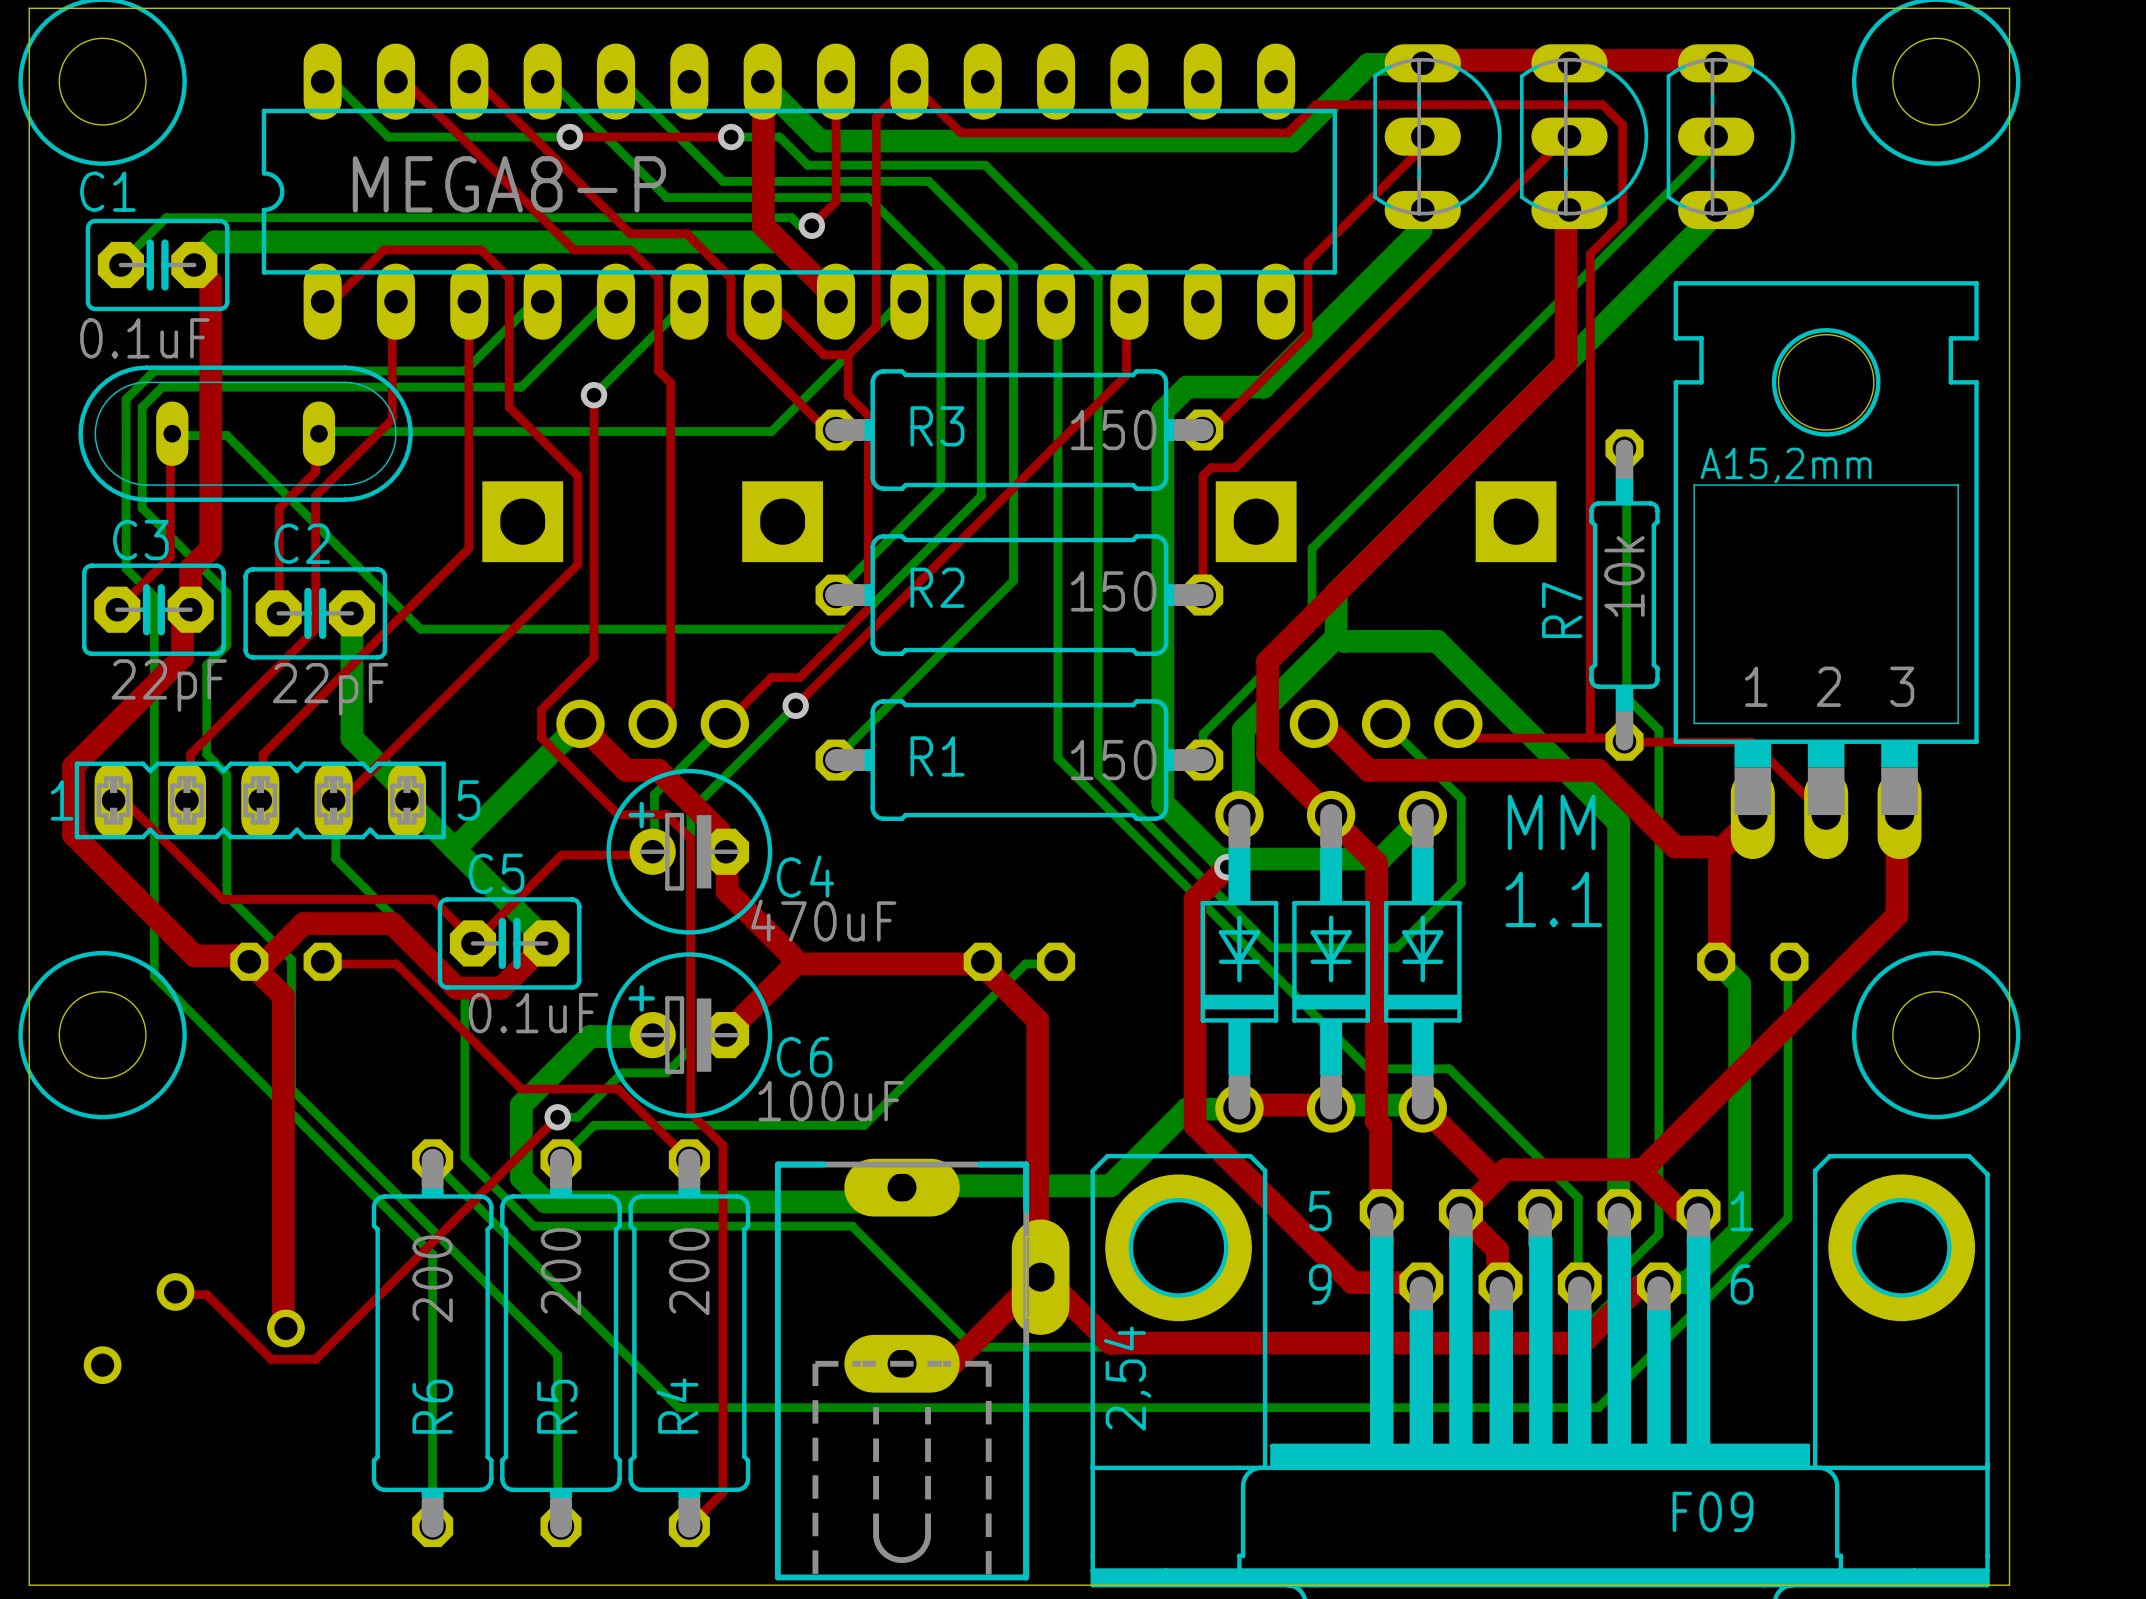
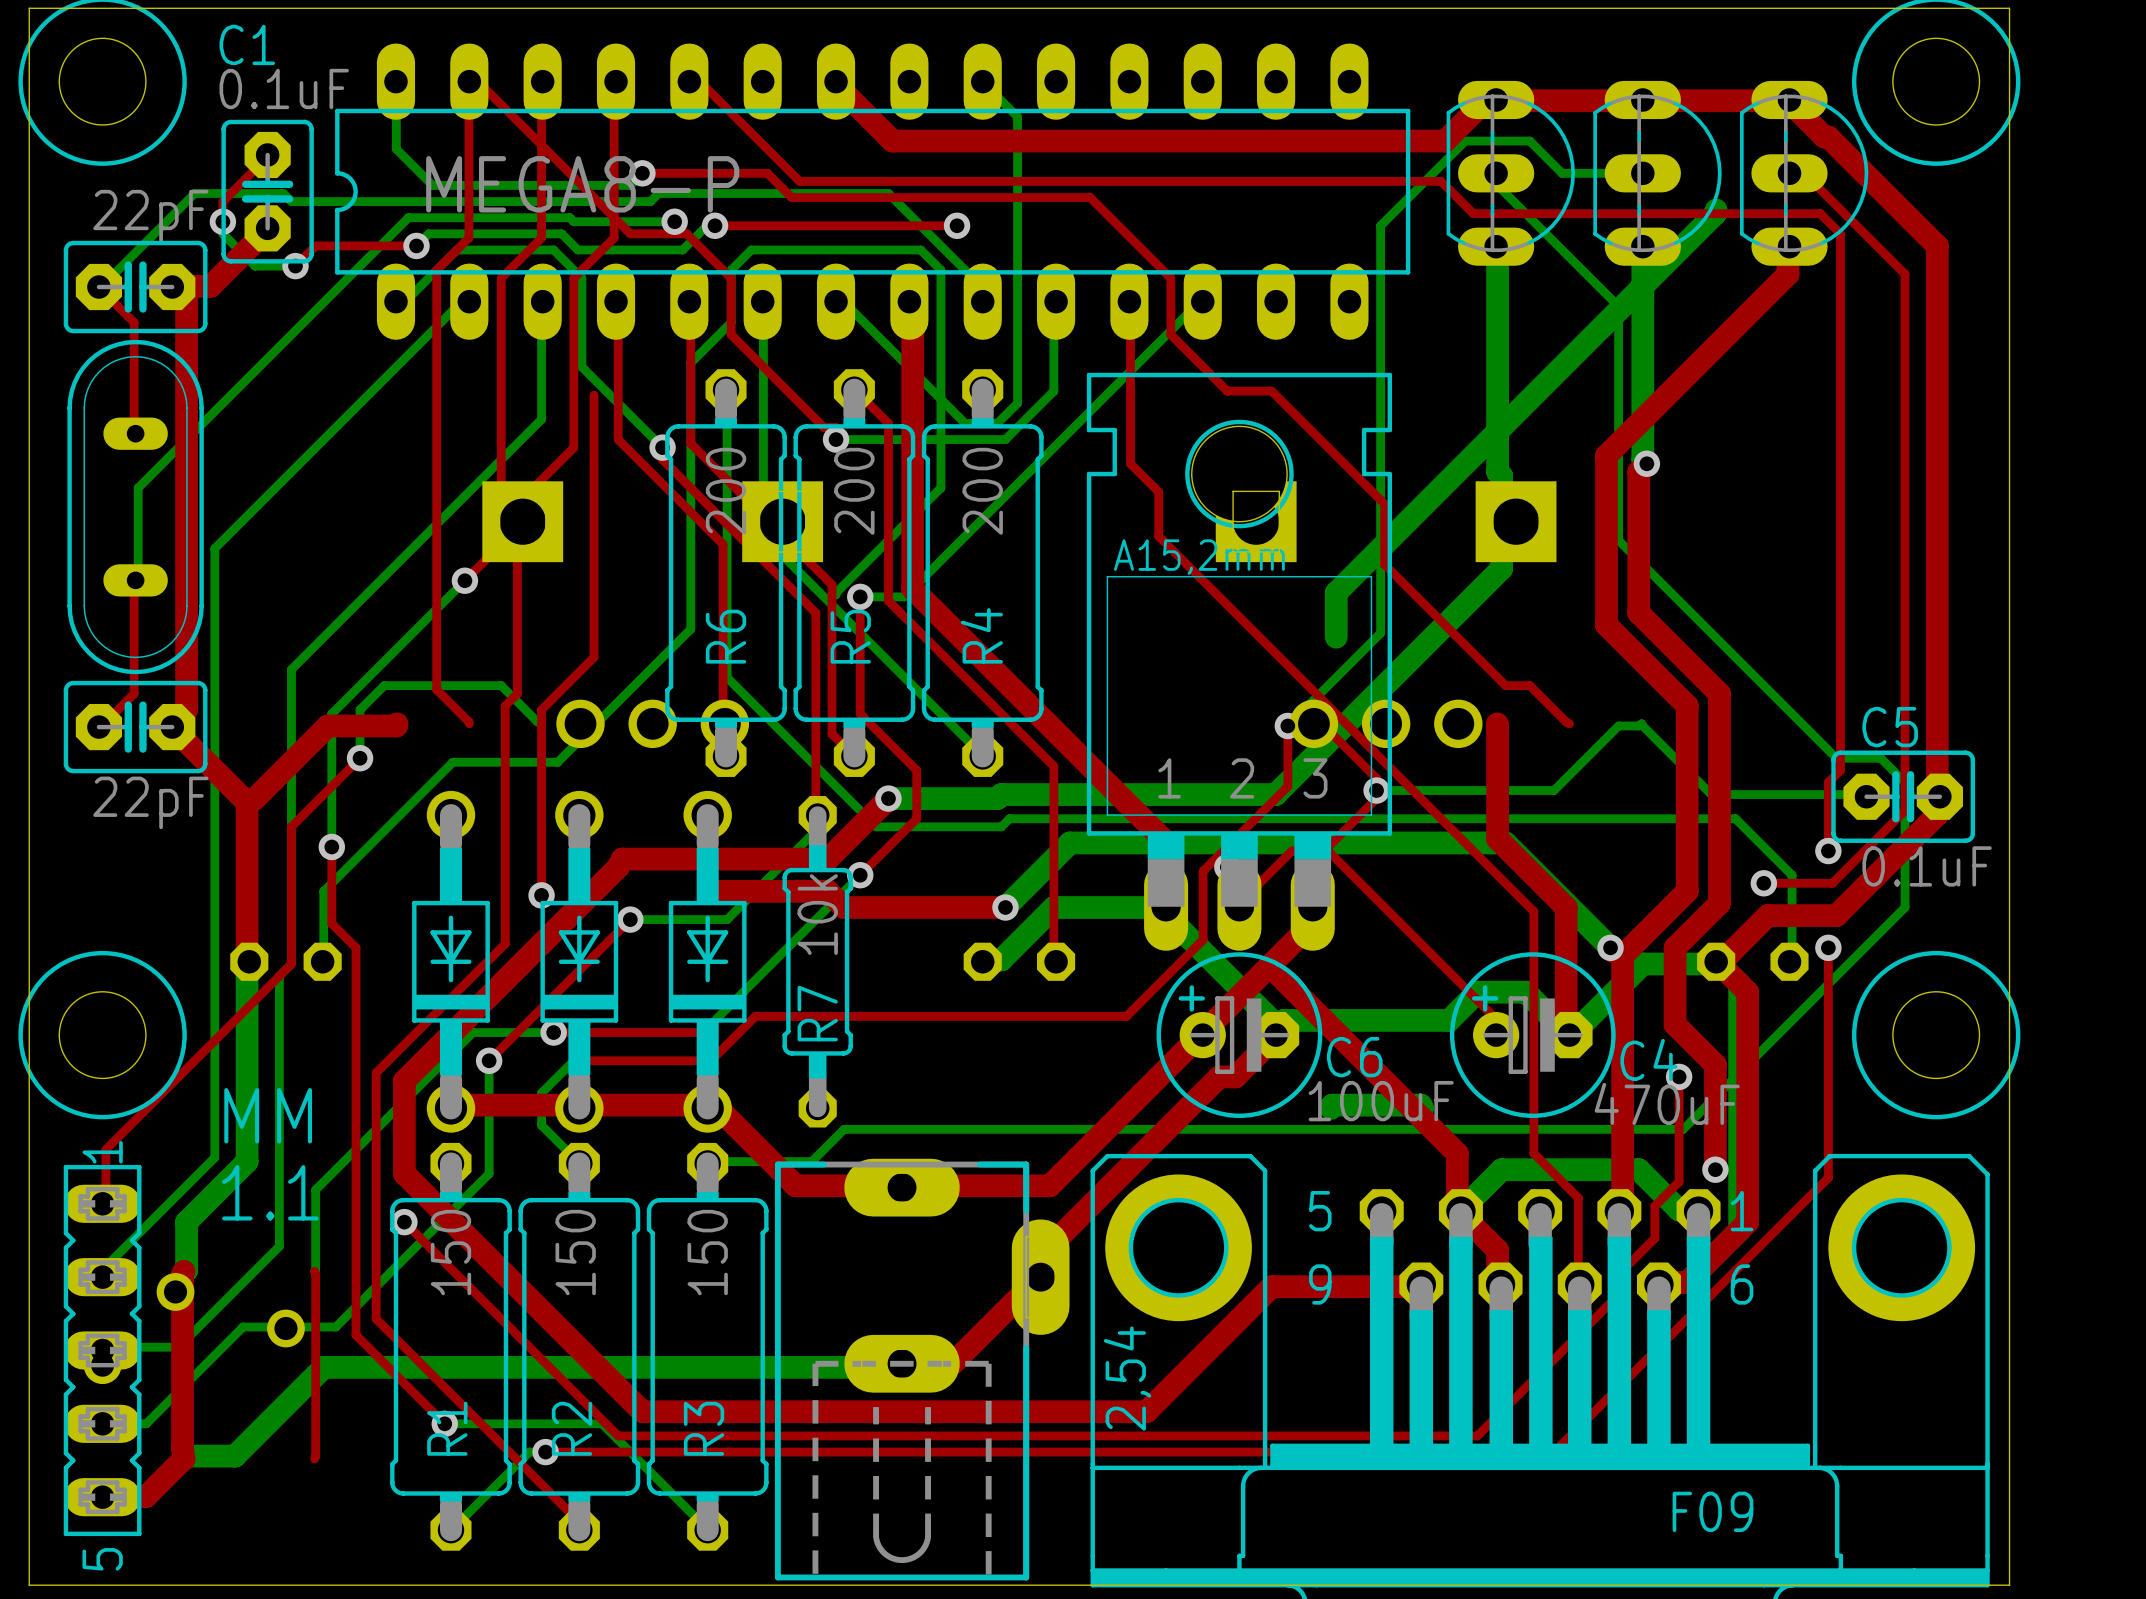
top track: (1422, 63) (1424, 60) (1566, 60) (1569, 63) (1578, 60) (1715, 60) (1716, 63) -> none
bottom track: (1422, 63) (1368, 64) (1291, 141) (819, 141) (763, 84) (762, 81) -> none
bottom track: (322, 81) (323, 84) (335, 84) (388, 137) (569, 137) -> none
top track: (395, 81) (396, 84) (408, 84) (573, 249) (630, 249) (658, 278) (658, 370) (670, 383) (670, 705) (652, 723) -> none
bottom track: none -> (395, 81) (396, 149) (432, 185) (630, 185) (642, 173)
top track: none -> (469, 81) (468, 237) (436, 270) (436, 689) (469, 723)
top track: none -> (542, 81) (541, 237) (501, 278) (501, 544) (464, 580)
bottom track: (542, 81) (545, 84) (553, 84) (666, 197) (868, 197) (920, 249) -> (322, 961) (323, 891) (452, 762) (557, 762) (690, 629) (690, 362) (731, 322) (731, 270) (751, 249) (920, 249)
top track: none -> (616, 81) (614, 84) (614, 237) (573, 278) (573, 447) (517, 504) (517, 693) (505, 705) (505, 943) (376, 1072) (376, 1318) (577, 1520) (579, 1530)
bottom track: (616, 81) (618, 84) (626, 84) (723, 181) (928, 181) (1013, 266) (1013, 580) (836, 760) -> none
top track: none -> (689, 81) (690, 84) (702, 84) (799, 181) (1441, 181) (1473, 213) (1820, 213) (1840, 233) (1840, 770) (1828, 782) (1828, 851)
top track: (762, 81) (763, 225) (836, 298) -> none
top track: (836, 84) (836, 201) (811, 225) -> none
top track: (1422, 136) (1420, 137) (1420, 149) (1308, 262) (1308, 334) (1215, 427) (1203, 427) (1202, 430) -> none
part: (1437, 136) -> none
top track: (1569, 136) (1566, 137) (1235, 467) (1211, 467) (1203, 475) (1202, 595) -> none
part: (1584, 136) -> none
bottom track: (1716, 136) (1715, 145) (1312, 548) (1312, 625) (1203, 734) (1202, 760) -> none
part: (1730, 136) -> none
top track: (569, 137) (731, 137) -> none
via: (569, 137) -> none
bottom track: (731, 137) (779, 137) (807, 165) (985, 165) (1098, 278) (1098, 774) (1271, 947) (1396, 947) (1461, 883) (1461, 798) (1386, 723) -> none
via: (731, 137) -> none
top track: none -> (267, 154) (222, 201) (222, 221)
top track: none -> (642, 173) (767, 173) (791, 197) (1090, 197) (1170, 278) (1170, 334) (1227, 391) (1271, 391) (1384, 504) (1384, 564) (1505, 685) (1529, 685) (1569, 723)
via: none -> (642, 173)
bottom track: none -> (1496, 173) (1497, 185) (1618, 306) (1618, 540) (1836, 758) (1880, 758) (1905, 782) (1905, 907) (1683, 1129) (844, 1129) (811, 1161) (710, 1161) (707, 1163)
part: none -> (1510, 173)
bottom track: none -> (1642, 173) (1562, 173) (1529, 141) (1465, 141) (1380, 225) (1380, 633) (1287, 725)
part: none -> (1657, 173)
top track: none -> (1789, 173) (1804, 173) (1905, 274) (1905, 810) (1832, 883) (1763, 883)
part: none -> (1804, 173)
C1 name position: C1 (107, 191) -> C1 (247, 44)
part position: (799, 191) -> (872, 191)
bottom track: (1422, 210) (1420, 229) (1263, 387) (1186, 387) (1162, 411) (1162, 802) (1219, 859) (1380, 859) (1422, 815) -> none
top track: (1569, 210) (1566, 213) (1566, 362) (1267, 661) (1267, 754) (1328, 814) (1331, 815) (1336, 822) (1376, 863) (1376, 1121) (1380, 1125) (1381, 1211) -> none
bottom track: (408, 217) (166, 217) (120, 265) -> (408, 217) (138, 487) (138, 576) (135, 580)
bottom track: (569, 217) (791, 217) (799, 225) (811, 225) -> (569, 217) (573, 221) (674, 221)
bottom track: none -> (222, 221) (222, 233) (255, 266) (295, 266)
via: none -> (222, 221)
via: none -> (674, 221)
top track: none -> (715, 225) (957, 225)
bottom track: none -> (715, 225) (706, 225) (682, 249) (577, 249) (561, 233) (428, 233) (416, 245)
via: none -> (715, 225)
via: (811, 225) -> none
via: none -> (957, 225)
top track: none -> (267, 228) (210, 286) (172, 287) (186, 294) (186, 709) (172, 727) (247, 802)
top track: none -> (416, 245) (315, 245) (295, 266)
via: none -> (416, 245)
bottom track: none -> (1496, 246) (1497, 471) (1501, 475) (1501, 568) (1275, 794) (1001, 794) (997, 798) (888, 798)
bottom track: none -> (1642, 246) (1642, 459) (1646, 463)
top track: none -> (1789, 246) (1788, 274) (1606, 455) (1606, 625) (1687, 705) (1687, 891) (1622, 955)
C1 rotation: 0° (157, 265) -> 90° clockwise (267, 191)
C1 position: (157, 265) -> (267, 191)
top track: (194, 265) (210, 282) (210, 548) (190, 568) (190, 609) (182, 617) (182, 657) (73, 766) (73, 834) (194, 955) (239, 955) (249, 961) -> none
bottom track: (194, 265) (194, 262) (214, 241) (779, 241) (836, 298) (836, 301) -> (982, 81) (1017, 116) (1017, 403) (997, 423) (965, 423) (844, 302) (836, 301)
via: none -> (295, 266)
top track: none -> (98, 287) (134, 322) (135, 433)
part: none -> 22pF (135, 287)
top track: (322, 301) (323, 298) (335, 298) (384, 249) (481, 249) (509, 278) (509, 407) (577, 475) (577, 564) (343, 798) (333, 800) -> none
top track: (395, 301) (392, 302) (392, 419) (315, 496) (315, 629) (190, 754) (190, 798) (186, 800) -> none
bottom track: none -> (395, 301) (396, 298) (408, 298) (456, 249) (553, 249) (581, 278) (581, 366) (662, 447)
top track: (469, 301) (468, 548) (263, 754) (263, 798) (260, 800) -> none
bottom track: none -> (469, 301) (460, 302) (214, 548) (214, 1157) (105, 1266) (105, 1274) (102, 1277)
top track: none -> (616, 301) (618, 302) (618, 439) (723, 544) (723, 754) (726, 756)
bottom track: (616, 301) (606, 302) (521, 387) (162, 387) (142, 407) (142, 508) (226, 592) (226, 645) (206, 665) (206, 754) (226, 774) (226, 895) (291, 959) -> (541, 302) (541, 419) (291, 669) (291, 959)
top track: none -> (689, 301) (690, 443) (832, 584) (832, 734) (854, 756)
bottom track: (689, 301) (594, 395) -> none
top track: (762, 301) (771, 302) (823, 354) (848, 354) -> none
bottom track: none -> (762, 301) (763, 536) (982, 756)
top track: none -> (909, 301) (912, 302) (912, 588) (1162, 838) (1162, 903) (1166, 906)
bottom track: (909, 301) (900, 302) (771, 431) (319, 431) (318, 433) -> none
bottom track: (982, 301) (981, 496) (848, 629) (420, 629) (226, 435) (174, 435) (172, 433) -> (982, 301) (981, 286) (888, 193) (658, 193) (650, 201) (291, 201) (283, 193) (194, 193) (101, 286) (98, 287)
bottom track: (1056, 301) (1057, 302) (1057, 758) (1368, 1068) (1449, 1068) (1578, 1197) (1579, 1284) -> (1056, 301) (1053, 302) (1053, 391) (1005, 439) (836, 439)
top track: (1129, 301) (1126, 302) (1126, 375) (795, 705) -> (1129, 301) (1130, 463) (1158, 492) (1158, 536) (1533, 911) (1533, 1153) (1578, 1197) (1579, 1284)
bottom track: none -> (1202, 301) (1199, 302) (904, 596) (860, 596)
bottom track: (541, 302) (533, 302) (464, 370) (154, 370) (126, 399) (126, 568) (154, 596) (154, 976) (432, 1254) (432, 1526) -> none
C1 value position: 0.1uF (144, 338) -> 0.1uF (284, 88)
top track: (848, 354) (876, 326) (876, 116) (909, 81) (961, 132) (1287, 132) (1316, 104) (1602, 104) (1622, 124) (1622, 221) (1590, 254) (1590, 738) -> none
top track: (848, 354) (848, 395) (868, 415) (868, 608) (799, 677) (771, 677) (724, 723) -> none
top track: none -> (854, 389) (888, 423) (888, 600) (1053, 766) (1053, 959) (1056, 961)
via position: (594, 395) -> (662, 447)
R3 name position: R3 (937, 426) -> R3 (704, 1428)
R3 rotation: 0° (1019, 430) -> 90° clockwise (707, 1346)
R3 position: (1019, 430) -> (707, 1346)
R3 value position: 150 (1113, 430) -> 150 (707, 1252)
top track: (172, 433) (170, 435) (170, 556) (117, 609) -> none
part rotation: 0° (245, 433) -> 90° clockwise (135, 507)
top track: (318, 433) (315, 435) (315, 471) (279, 508) (278, 613) -> none
via: none -> (836, 439)
top track: none -> (662, 447) (662, 459) (815, 613) (815, 814) (817, 815)
bottom track: (1624, 448) (1626, 451) (1626, 697) (1658, 730) (1658, 1234) (1614, 1278) (1614, 1298) (1566, 1347) (973, 1347) (852, 1226) (533, 1226) (464, 1157) (464, 988) (335, 859) (335, 802) (333, 800) -> none
top track: none -> (1646, 463) (1638, 471) (1638, 613) (1719, 693) (1719, 851)
via: none -> (1646, 463)
part position: (1826, 570) -> (1239, 661)
R7 value position: 10k (1624, 576) -> 10k (817, 914)
top track: none -> (135, 580) (134, 693) (98, 727)
bottom track: none -> (464, 580) (331, 713) (331, 846)
via: none -> (464, 580)
R2 name position: R2 (937, 587) -> R2 (572, 1428)
R2 value position: 150 (1113, 591) -> 150 (575, 1252)
R2 rotation: 0° (1019, 595) -> 90° clockwise (579, 1346)
R2 position: (1019, 595) -> (579, 1346)
R7 position: (1624, 595) -> (817, 961)
top track: none -> (860, 596) (860, 713) (916, 770) (916, 818) (860, 875)
via: none -> (860, 596)
C3: 22pF (153, 609) -> none
R7 name position: R7 (1562, 610) -> R7 (817, 1013)
C2: 22pF (315, 613) -> none
bottom track: (351, 613) (351, 738) (404, 790) (408, 802) (545, 939) (546, 943) -> none
bottom track: (795, 705) (690, 810) (690, 1048) (666, 1072) (622, 1072) (577, 1117) (557, 1117) -> none
via: (795, 705) -> none
top track: none -> (397, 723) (396, 725) (327, 725) (255, 798) (247, 802)
bottom track: none -> (541, 723) (501, 685) (384, 685) (360, 709) (360, 758)
top track: (580, 723) (626, 770) (658, 770) (719, 830) (719, 842) (727, 855) (727, 891) (791, 955) (795, 963) -> none
bottom track: (580, 723) (454, 849) -> none
bottom track: (724, 723) (654, 794) (654, 851) (652, 851) -> none
top track: (1458, 723) (1473, 738) (1622, 738) (1626, 742) (1751, 742) (1826, 815) -> none
top track: none -> (1497, 723) (1497, 838) (1566, 907) (1566, 1032) (1569, 1035)
top track: none -> (1287, 725) (1287, 786) (1203, 871) (1203, 939) (1126, 1016) (755, 1016) (710, 1060) (573, 1060)
via: none -> (1287, 725)
top track width: thick (1324, 725) (1368, 770) -> thin (1324, 725) (1368, 770)
part: none -> 22pF (135, 727)
top track: (541, 738) (618, 814) (666, 814) (690, 838) (690, 1113) (723, 1145) (723, 1492) (689, 1526) -> (541, 738) (541, 895)
R1 name position: R1 (937, 756) -> R1 (447, 1428)
top track: none -> (360, 758) (291, 826) (291, 963) (105, 1149) (105, 1201) (102, 1203)
via: none -> (360, 758)
R1 rotation: 0° (1019, 760) -> 90° clockwise (450, 1346)
R1 position: (1019, 760) -> (450, 1346)
R1 value position: 150 (1113, 760) -> 150 (450, 1252)
top track: (1368, 770) (1598, 770) (1675, 846) (1711, 846) (1719, 851) (1751, 818) (1752, 815) -> (1368, 770) (1376, 778) (1376, 798) (1328, 846) (1328, 851)
bottom track: none -> (1376, 790) (1554, 790) (1618, 725) (1638, 725) (1641, 723) (1711, 794) (1864, 794) (1866, 796)
via: none -> (1376, 790)
via: none -> (888, 798)
top track: (113, 800) (113, 802) (126, 802) (222, 899) (432, 899) (472, 939) (472, 943) (561, 855) (650, 855) (652, 851) -> none
part: (260, 800) -> none
bottom track: (1239, 814) (1243, 810) (1243, 730) (1336, 637) (1344, 641) (1437, 641) (1618, 822) (1619, 1211) -> none
bottom track: none -> (817, 815) (815, 830) (727, 919) (630, 919)
top track: (1899, 815) (1896, 818) (1896, 915) (1640, 1171) -> none
text: MM (1551, 822) -> none
top track: none -> (331, 846) (331, 923) (356, 947) (356, 1335) (444, 1423)
via: none -> (331, 846)
C4 position: (689, 851) -> (1532, 1035)
top track: none -> (1328, 851) (1291, 851) (1239, 903) (1239, 906)
top track: none -> (1328, 851) (1493, 1016) (1493, 1032) (1496, 1035)
via: none -> (1828, 851)
top track: (1227, 867) (1195, 899) (1195, 1125) (1352, 1282) (1420, 1282) (1421, 1284) -> (888, 798) (827, 859) (622, 859) (618, 867) (404, 1080) (404, 1173) (642, 1411) (1146, 1411) (1271, 1286) (1420, 1286) (1421, 1284)
bottom track: none -> (860, 875) (702, 1032)
via: none -> (860, 875)
via: none -> (1763, 883)
top track: none -> (719, 891) (827, 891) (844, 907) (1005, 907)
via: none -> (541, 895)
text: 1.1 (1553, 899) -> none
top track: (1719, 903) (1719, 959) (1716, 961) -> (1719, 903) (1675, 947) (1675, 1024) (1715, 1064) (1715, 1169)
top track: none -> (1312, 906) (1312, 923) (1203, 1032) (1202, 1035) (1049, 1185) (912, 1185) (902, 1187) (900, 1185) (795, 1185) (719, 1109) (707, 1108) (706, 1105) (589, 1105) (579, 1108) (577, 1105) (452, 1105) (450, 1108)
bottom track: none -> (1005, 907) (1070, 842) (1505, 842) (1610, 947)
via: none -> (1005, 907)
top track: none -> (630, 919) (489, 1060)
via: none -> (630, 919)
C5 position: (509, 943) -> (1903, 796)
top track: (546, 943) (501, 988) (456, 988) (392, 923) (303, 923) (263, 963) (249, 961) -> (247, 802) (247, 959) (249, 961)
via: none -> (1610, 947)
top track: none -> (1828, 947) (1828, 1177) (1554, 1452) (545, 1452)
via: none -> (1828, 947)
top track: none -> (1622, 955) (1622, 1210) (1619, 1211)
top track: (249, 961) (283, 996) (283, 1327) (285, 1328) -> none
bottom track: none -> (249, 961) (247, 963) (247, 1161) (186, 1222) (186, 1270) (184, 1271)
top track: (322, 961) (323, 963) (396, 963) (521, 1089) (618, 1089) (689, 1159) -> none
part: none -> (450, 961)
part: none -> (579, 961)
part: none -> (707, 961)
bottom track: none -> (982, 961) (985, 959) (1001, 959) (1053, 907) (1166, 906) (1166, 915) (1275, 1024) (1276, 1035) (1283, 1020) (1449, 1020) (1477, 992) (1525, 992) (1570, 1036) (1642, 963) (1715, 963) (1716, 961)
bottom track: (1056, 961) (1053, 963) (1025, 963) (864, 1125) (594, 1125) (561, 1159) -> none
part: (1239, 961) -> none
part: (1331, 961) -> none
part: (1422, 961) -> none
bottom track: (1789, 961) (1788, 1218) (1598, 1407) (678, 1407) (432, 1159) -> (1789, 961) (1792, 959) (1792, 875) (1735, 818) (1009, 818) (1001, 826) (876, 826) (727, 677) (726, 389)
bottom track: (291, 963) (291, 1089) (557, 1355) (557, 1524) (561, 1526) -> (291, 963) (279, 976) (279, 1246) (178, 1347) (105, 1347) (102, 1350)
top track: (795, 963) (981, 963) (982, 961) (989, 972) (1037, 1020) (1037, 1266) (1040, 1277) (1049, 1282) (1110, 1343) (1582, 1343) (1638, 1286) (1658, 1286) (1658, 1284) -> (836, 84) (892, 141) (1445, 141) (1485, 100) (1789, 99) (1824, 137) (1828, 137) (1937, 245) (1937, 786) (1939, 796) (1937, 798) (1937, 814) (1836, 915) (1767, 915) (1727, 955) (1716, 961) (1747, 992) (1747, 1222) (1687, 1282) (1658, 1282) (1658, 1284)
top track: (795, 963) (726, 1035) -> none
top track: none -> (553, 1032) (702, 1032)
bottom track: none -> (553, 1032) (472, 1032) (315, 1189) (314, 1271)
via: none -> (553, 1032)
bottom track: (652, 1035) (589, 1036) (521, 1105) (521, 1177) (545, 1201) (888, 1201) (902, 1187) (912, 1185) (1110, 1185) (1186, 1109) (1239, 1108) -> none
C6 position: (689, 1035) -> (1239, 1035)
top track: none -> (1276, 1035) (1235, 1076) (1219, 1076) (1041, 1254) (1040, 1277)
bottom track: none -> (489, 1060) (489, 1173) (335, 1327) (243, 1327) (146, 1423) (102, 1423)
via: none -> (489, 1060)
bottom track: none -> (573, 1060) (541, 1093) (541, 1125) (579, 1163)
top track: none -> (1679, 1076) (1679, 1181) (1654, 1206) (1654, 1238) (1614, 1278) (1614, 1298) (1477, 1435) (618, 1435) (404, 1222)
via: none -> (1679, 1076)
top track: (1239, 1108) (1239, 1105) (1328, 1105) (1331, 1108) -> none
top track: (1422, 1108) (1495, 1179) -> none
text: none -> MM (268, 1115)
top track: (557, 1117) (315, 1359) (271, 1359) (206, 1294) (178, 1294) (175, 1291) -> none
via: (557, 1117) -> none
via: none -> (1715, 1169)
text: none -> 1.1 (270, 1192)
top track: (1460, 1211) (1469, 1206) (1505, 1169) (1638, 1169) (1679, 1210) (1698, 1211) -> (1460, 1211) (1457, 1201) (1457, 1153) (1269, 965)
bottom track: none -> (1460, 1211) (1501, 1169) (1638, 1169) (1679, 1210) (1698, 1211)
via: none -> (404, 1222)
top track: none -> (184, 1271) (184, 1459) (146, 1496) (102, 1497)
top track: none -> (314, 1271) (314, 1459)
R5 value position: 200 (561, 1271) -> 200 (854, 491)
R4 value position: 200 (689, 1271) -> 200 (982, 491)
R6 value position: 200 (432, 1278) -> 200 (726, 491)
R6 position: (432, 1343) -> (726, 573)
R5 position: (561, 1343) -> (854, 573)
R4 position: (689, 1343) -> (982, 573)
part: none -> (102, 1350)
bottom track: none -> (902, 1363) (900, 1367) (323, 1367) (234, 1456) (186, 1456) (184, 1459)
R4 name position: R4 (677, 1405) -> R4 (981, 635)
bottom track: none -> (444, 1423) (602, 1423) (707, 1530)
via: none -> (444, 1423)
bottom track: none -> (545, 1452) (529, 1452) (450, 1530)
via: none -> (545, 1452)

